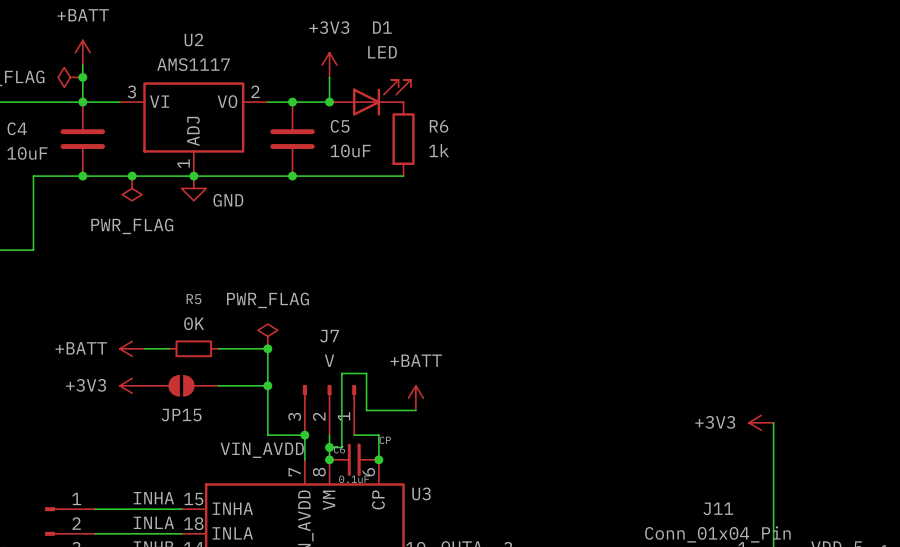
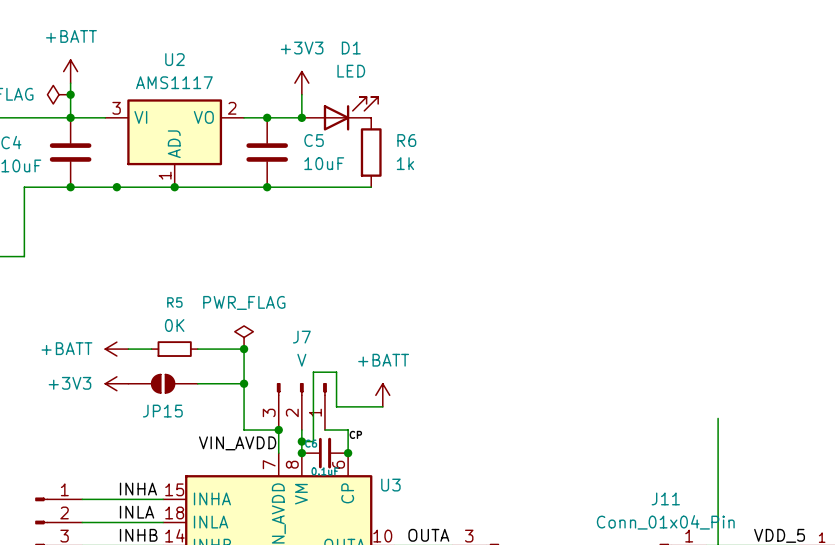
power symbol: PWR_FLAG (132, 188) -> none
power symbol: GND (193, 188) -> none
power symbol: +3V3 (761, 422) -> none

